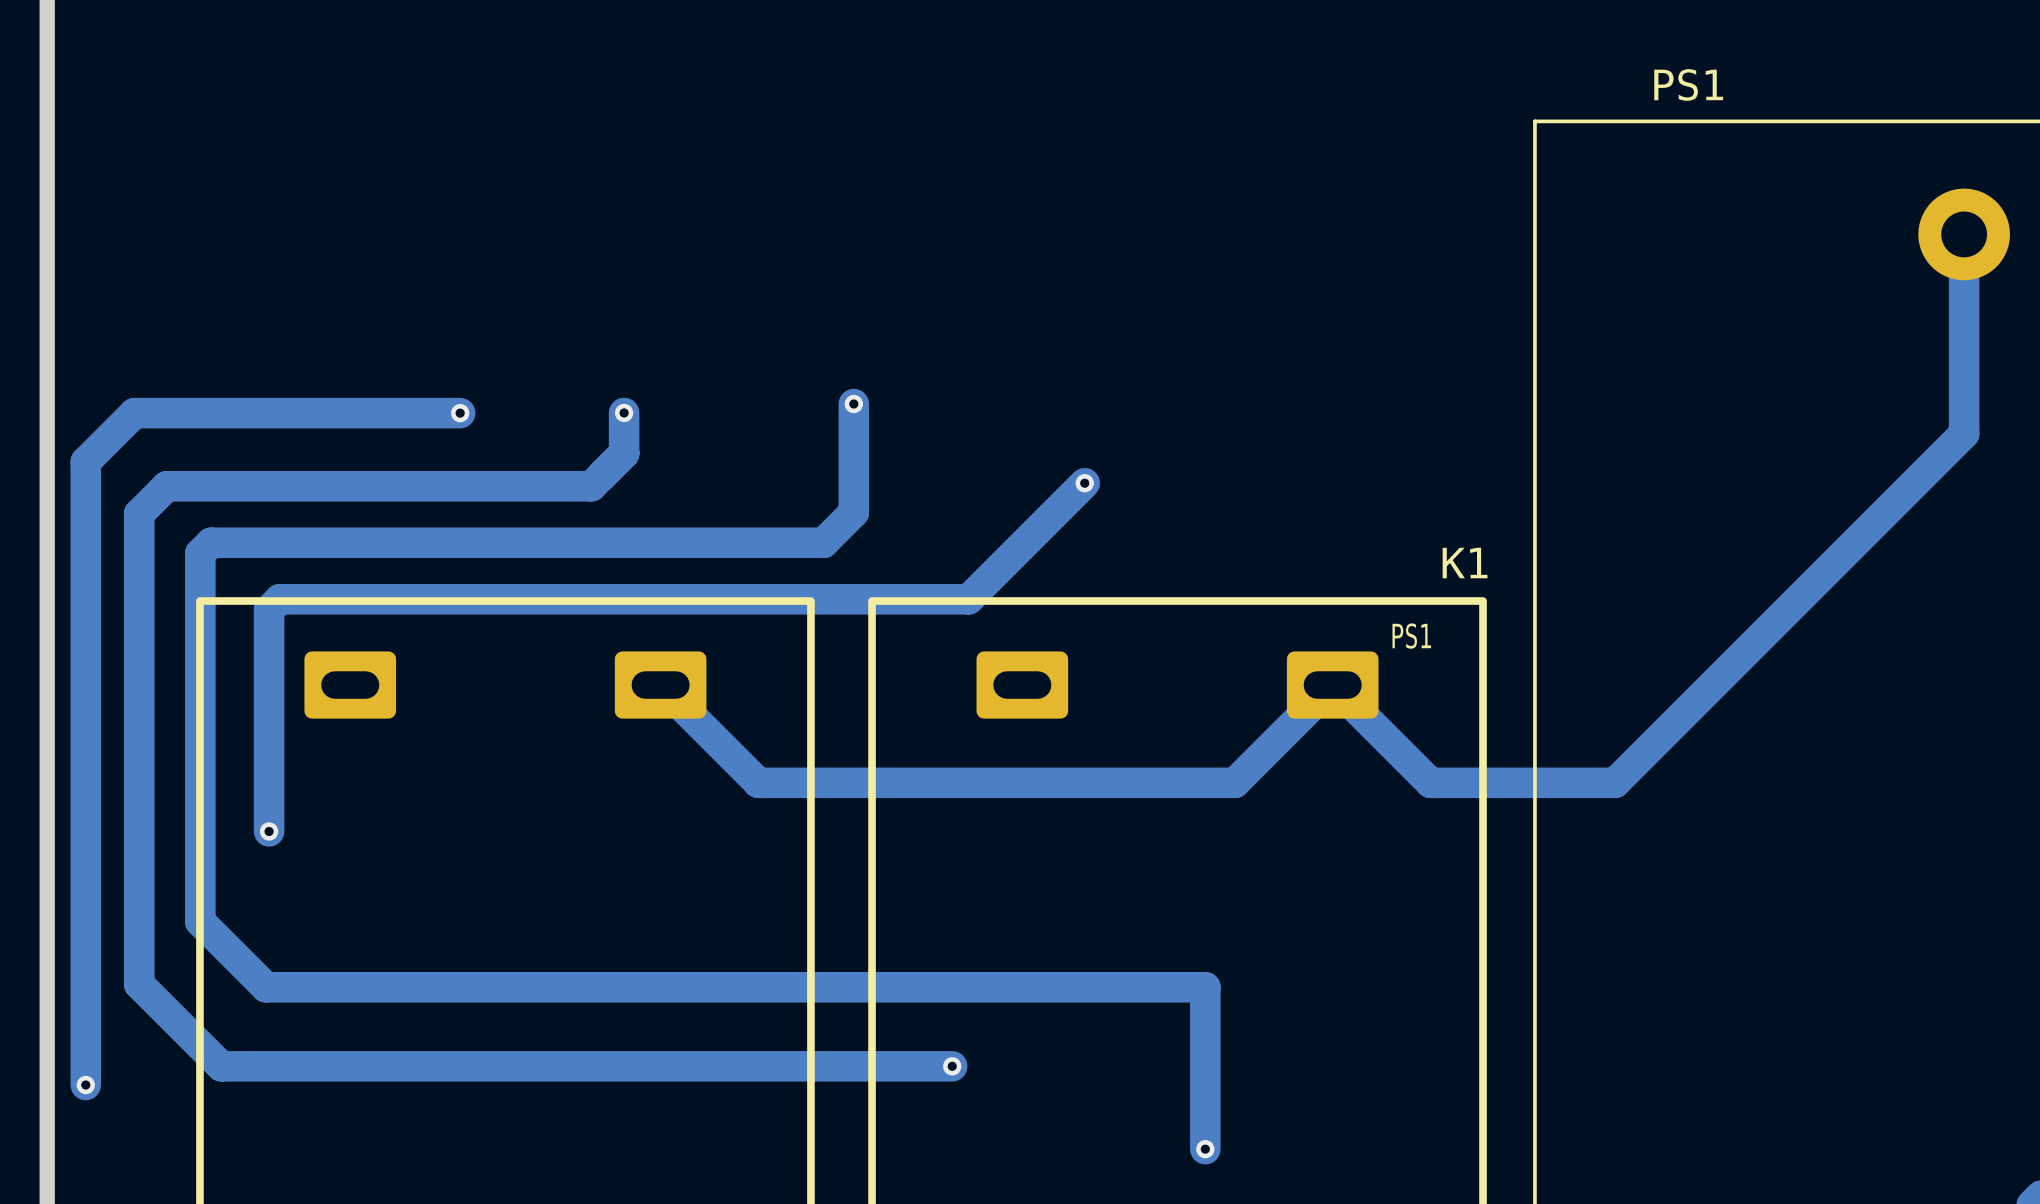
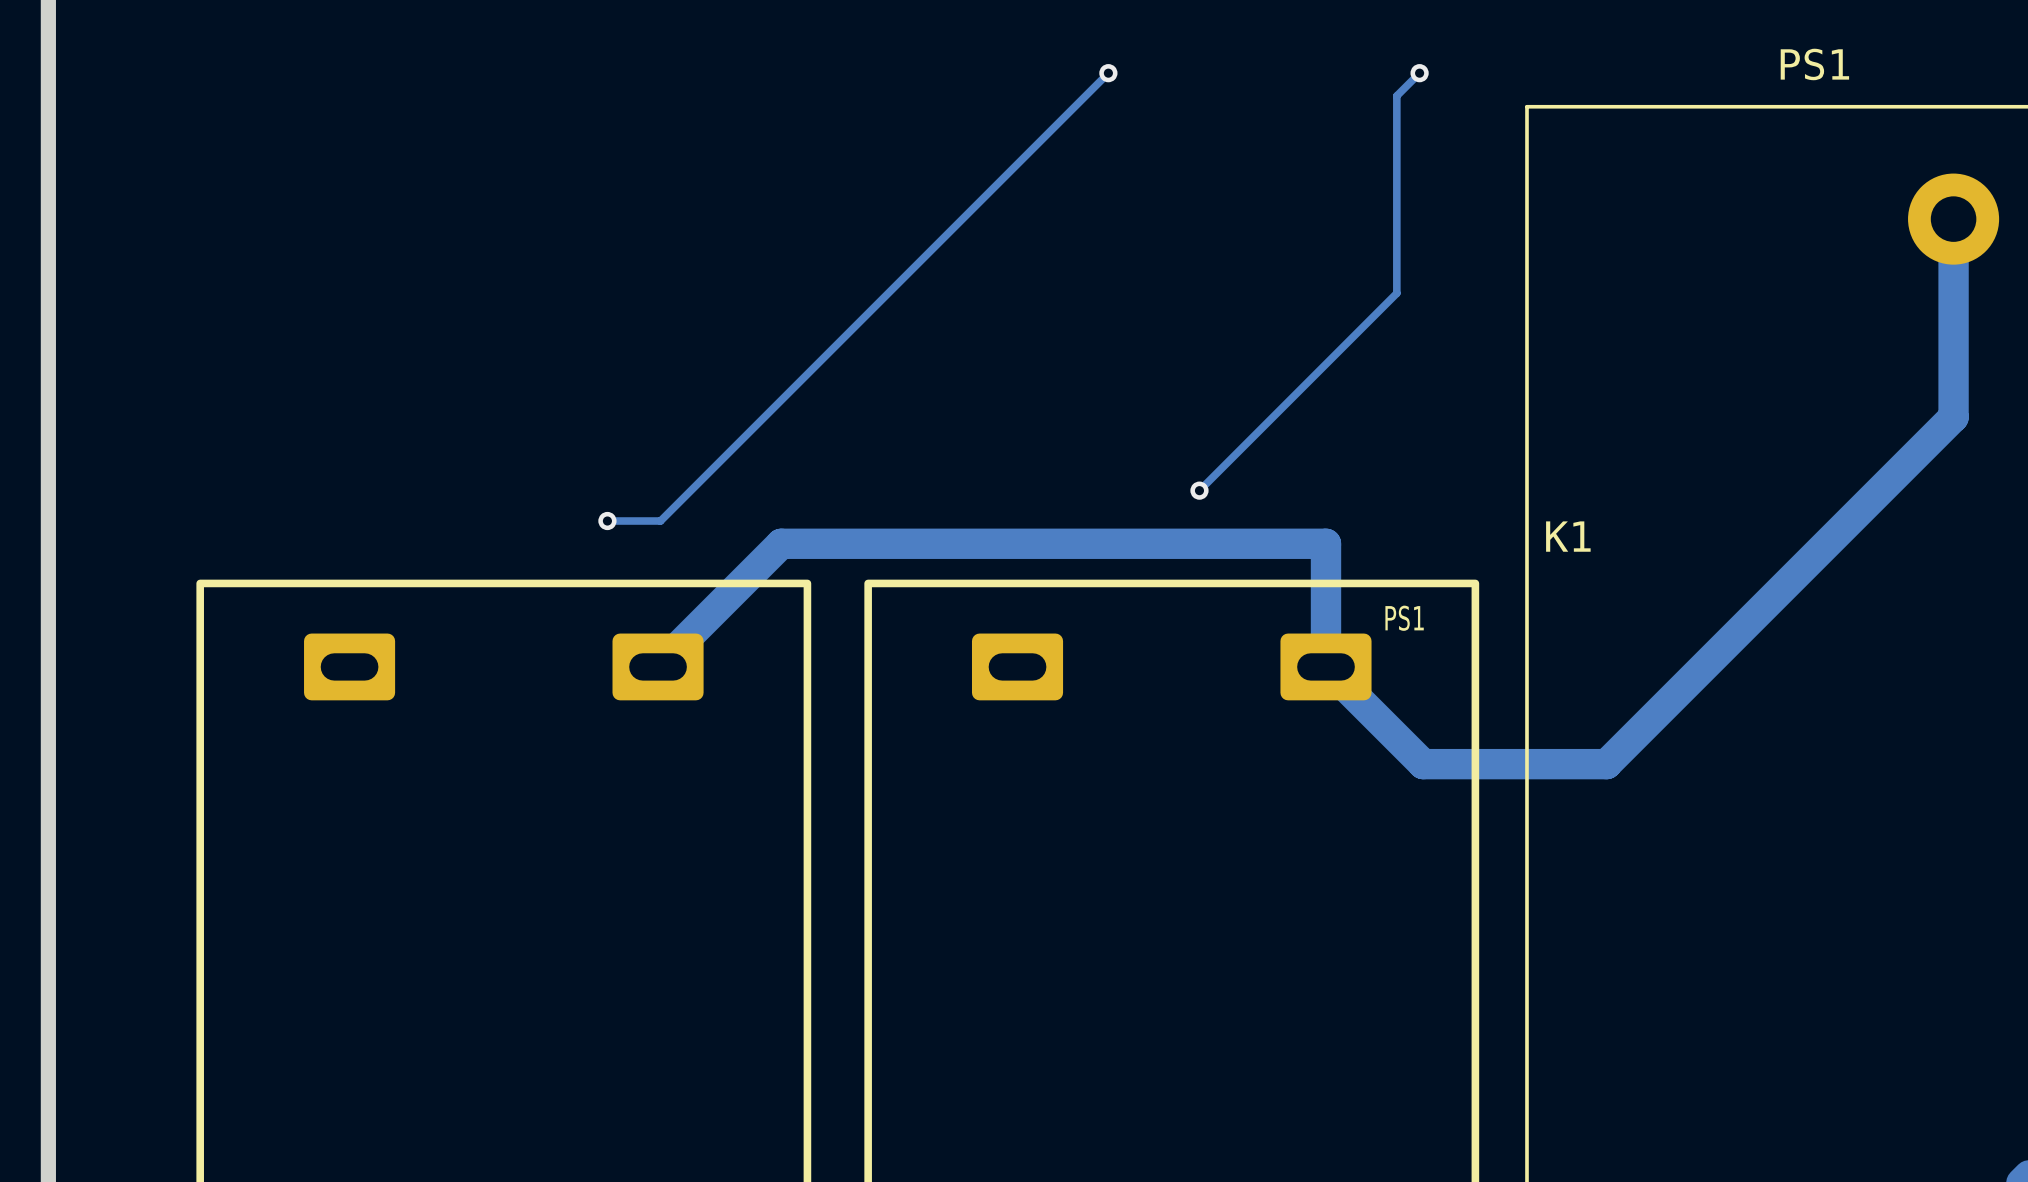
PS1 name position: PS1 (1688, 84) -> PS1 (1814, 64)
track: none -> (1108, 73) (660, 521) (607, 521)
via: none -> (1108, 73)
track: none -> (1419, 73) (1396, 95) (1396, 293) (1199, 490)
via: none -> (1419, 73)
track: (853, 404) (853, 512) (823, 542) (211, 542) (200, 553) (200, 921) (266, 987) (1205, 987) (1205, 1149) -> none
via: (853, 404) -> none
track: (624, 412) (624, 453) (591, 486) (166, 486) (139, 513) (139, 984) (221, 1066) (952, 1066) -> none
via: (624, 412) -> none
track: (460, 413) (134, 413) (85, 461) (85, 1085) -> none
via: (460, 413) -> none
track: (1084, 483) (968, 599) (279, 599) (269, 609) (269, 831) -> none
via position: (1084, 483) -> (1199, 490)
via: none -> (607, 521)
K1 name position: K1 (1465, 563) -> K1 (1568, 536)
track: (1332, 685) (1234, 782) (758, 782) (660, 685) -> (1325, 666) (1325, 543) (781, 543) (658, 666)
via: (269, 831) -> none
via: (952, 1066) -> none
via: (85, 1085) -> none
via: (1205, 1149) -> none

